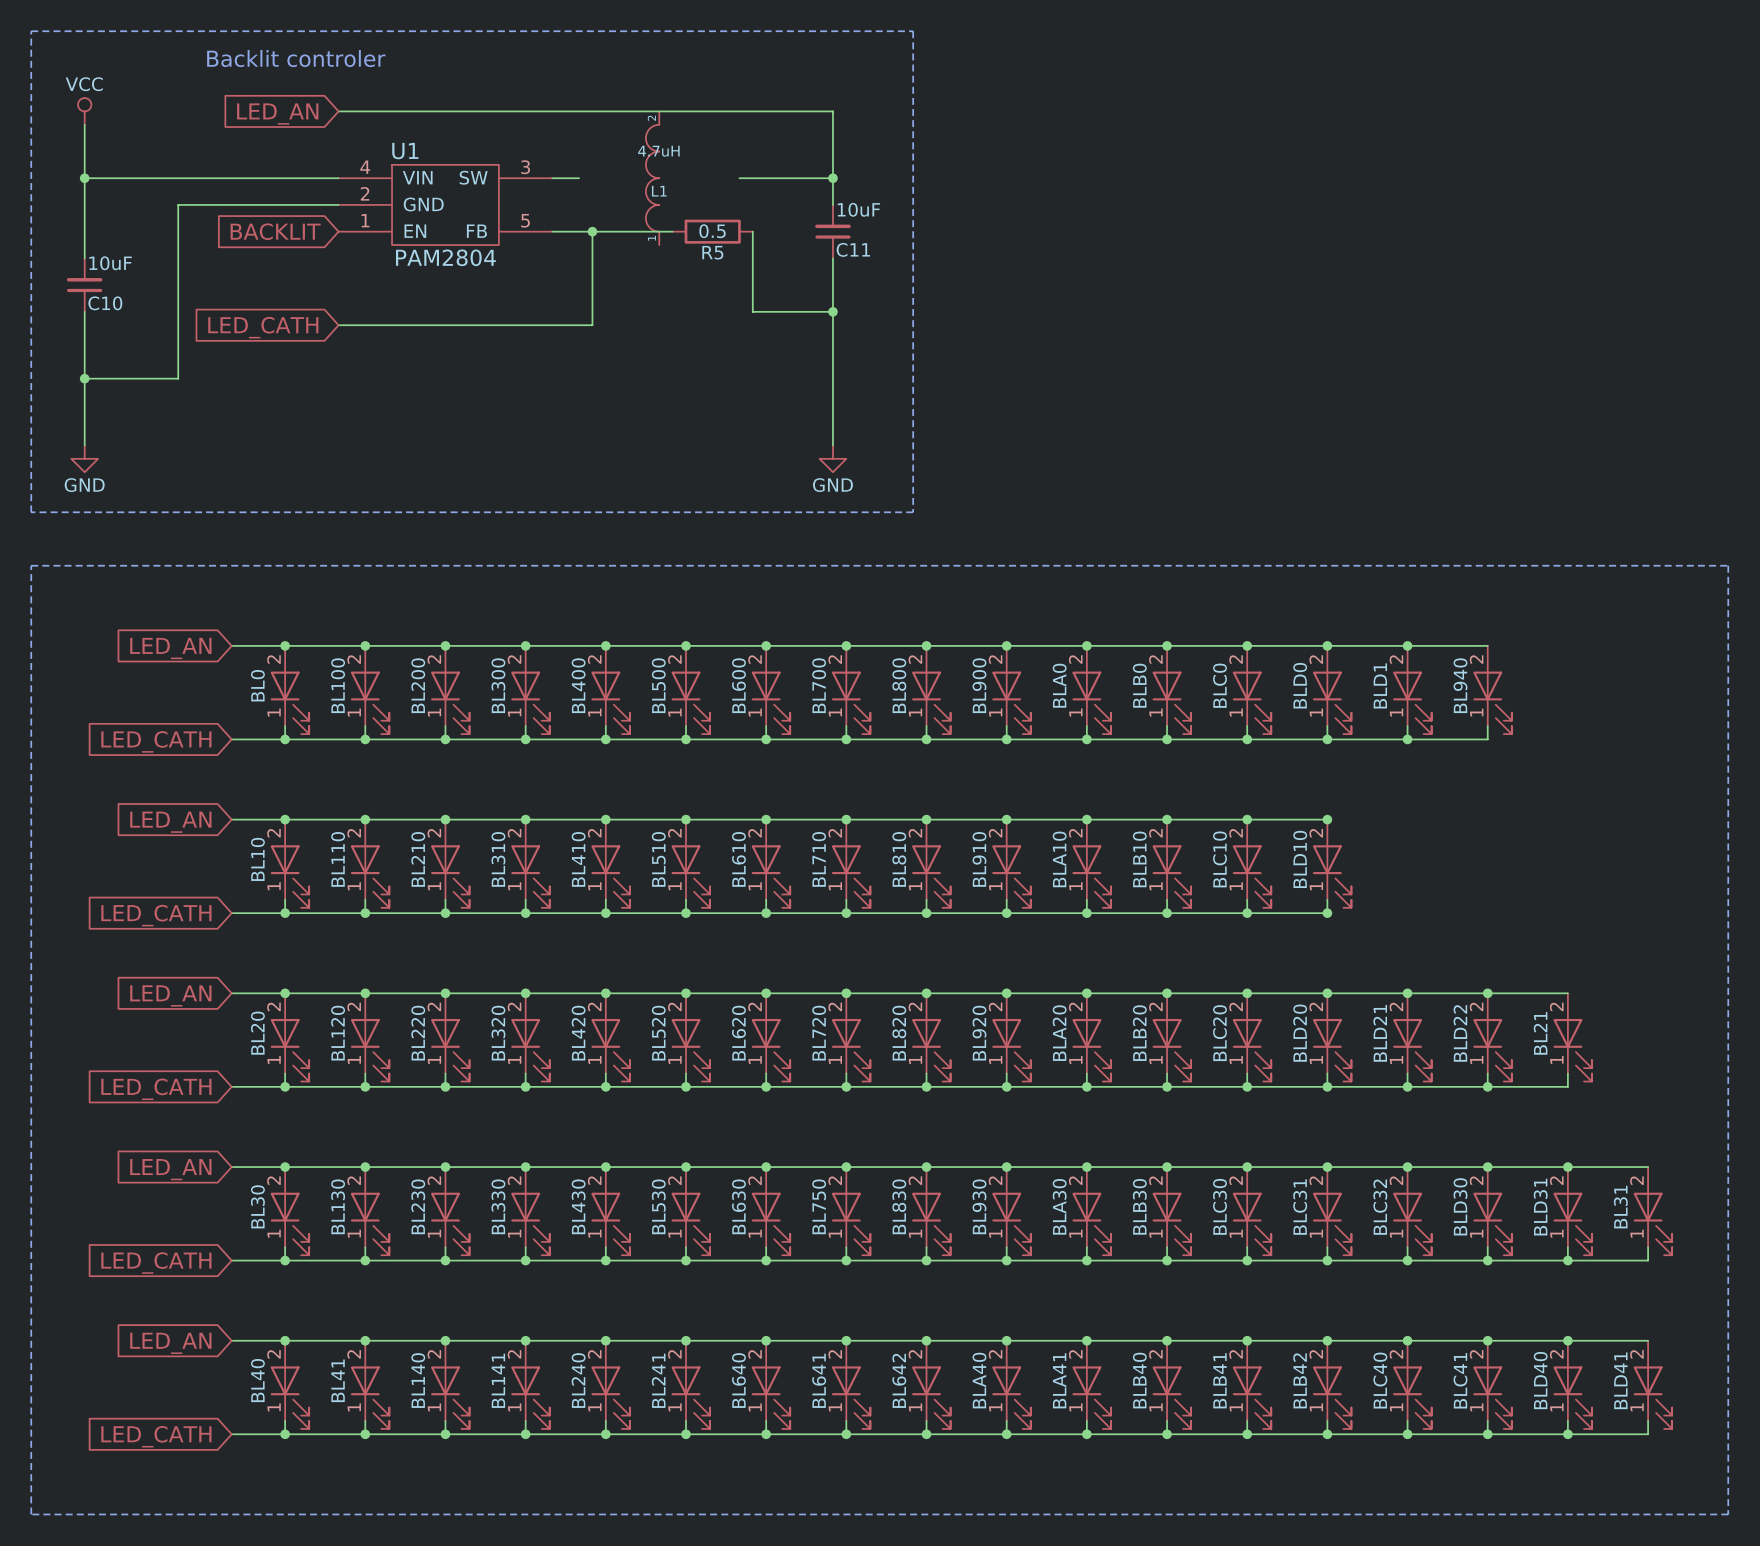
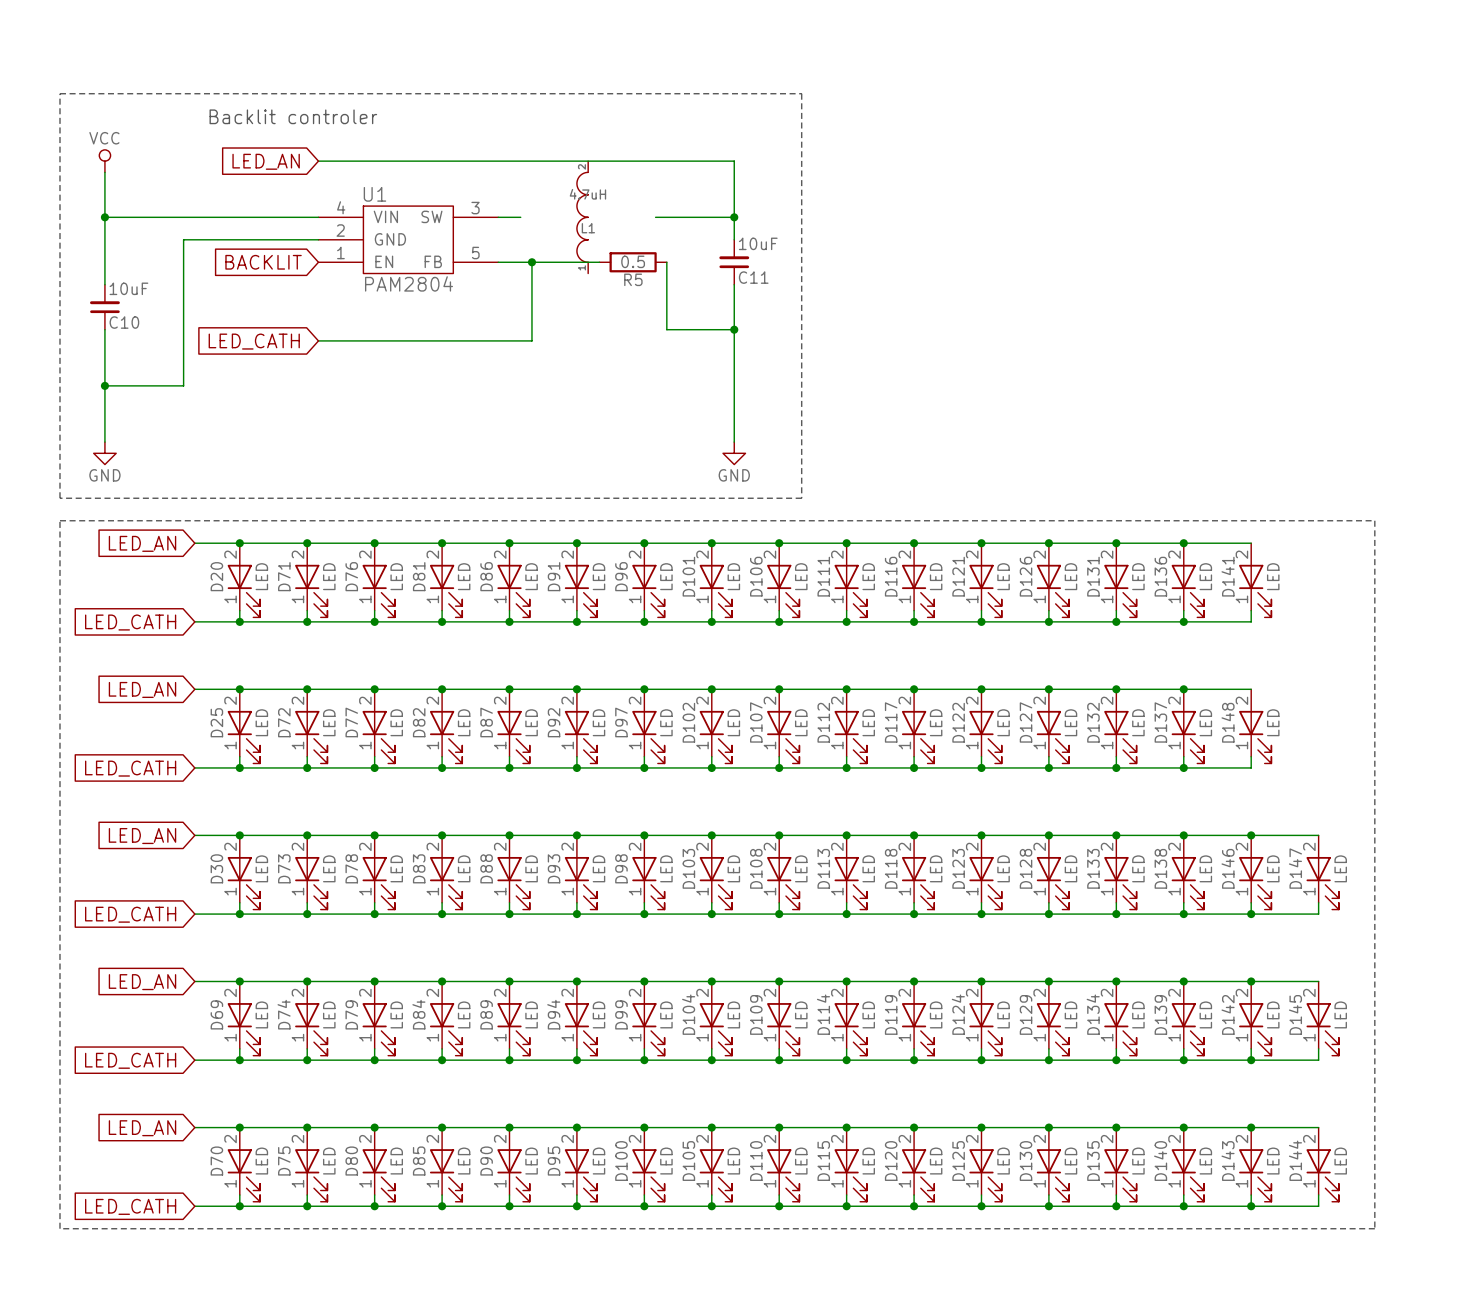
line: (31, 31) (31, 512) (913, 512) (913, 31) (31, 31) -> (59, 93) (59, 498) (801, 498) (801, 93) (59, 93)
text position: Backlit controler (296, 58) -> Backlit controler (293, 116)
power symbol position: VCC (84, 111) -> VCC (104, 161)
wire: (338, 111) (832, 111) (832, 204) -> (318, 161) (734, 161) (734, 239)
global label position: LED_AN (277, 114) -> LED_AN (266, 161)
wire: (84, 124) (84, 258) -> (104, 172) (104, 284)
wire: (84, 178) (338, 178) -> (104, 217) (318, 217)
junction: (84, 178) -> none
wire: (552, 178) (579, 178) -> (498, 217) (520, 217)
L1 position: (652, 178) -> (582, 217)
wire: (739, 178) (832, 178) -> (655, 217) (734, 217)
junction: (832, 178) -> none
wire: (338, 204) (178, 204) (178, 378) (84, 378) -> (318, 239) (183, 239) (183, 385) (104, 385)
U1 position: (445, 204) -> (408, 239)
global label position: BACKLIT (275, 231) -> BACKLIT (263, 262)
wire: (552, 231) (672, 231) -> (498, 262) (599, 262)
wire: (592, 231) (592, 325) (338, 325) -> (531, 262) (531, 340) (318, 340)
junction: (592, 231) -> none
R5 position: (712, 231) -> (633, 262)
wire: (752, 231) (752, 311) (832, 311) -> (666, 262) (666, 329) (734, 329)
C11 position: (832, 231) -> (734, 262)
junction: none -> (104, 217)
wire: (832, 258) (832, 445) -> (734, 284) (734, 442)
junction: none -> (734, 217)
C10 position: (84, 285) -> (104, 307)
wire: (84, 311) (84, 445) -> (104, 329) (104, 442)
junction: none -> (531, 262)
junction: (832, 311) -> none
global label position: LED_CATH (263, 327) -> LED_CATH (254, 341)
junction: (84, 378) -> none
junction: none -> (734, 329)
power symbol position: GND (84, 458) -> GND (104, 453)
junction: none -> (104, 385)
power symbol position: GND (832, 458) -> GND (734, 453)
line: (31, 565) (31, 1514) (1728, 1514) (1728, 565) (31, 565) -> (59, 520) (59, 1228) (1374, 1228) (1374, 520) (59, 520)
BL0 name: BL0 (257, 685) -> D20 (216, 576)
BL0 value: none -> LED (261, 576)
BL100 name: BL100 (338, 685) -> D71 (284, 576)
BL100 value: none -> LED (329, 576)
BL200 name: BL200 (418, 685) -> D76 (351, 576)
BL200 value: none -> LED (396, 576)
BL300 name: BL300 (498, 685) -> D81 (419, 576)
BL300 value: none -> LED (464, 576)
BL400 name: BL400 (578, 685) -> D86 (486, 576)
BL400 value: none -> LED (531, 576)
BL500 name: BL500 (658, 685) -> D91 (554, 576)
BL500 value: none -> LED (598, 576)
BL600 name: BL600 (738, 685) -> D96 (621, 576)
BL600 value: none -> LED (666, 576)
BL700 name: BL700 (819, 685) -> D101 (688, 576)
BL700 value: none -> LED (733, 576)
BL800 name: BL800 (899, 685) -> D106 (756, 576)
BL800 value: none -> LED (801, 576)
BL900 name: BL900 (979, 685) -> D111 (823, 576)
BL900 value: none -> LED (868, 576)
BLA0 name: BLA0 (1059, 685) -> D116 (891, 576)
BLA0 value: none -> LED (936, 576)
BLB0 name: BLB0 (1139, 685) -> D121 (958, 576)
BLB0 value: none -> LED (1003, 576)
BLC0 name: BLC0 (1220, 685) -> D126 (1026, 576)
BLC0 value: none -> LED (1070, 576)
BLD0 name: BLD0 (1300, 685) -> D131 (1093, 576)
BLD0 value: none -> LED (1138, 576)
BLD1 name: BLD1 (1380, 685) -> D136 (1160, 576)
BLD1 value: none -> LED (1205, 576)
BL940 name: BL940 (1460, 685) -> D141 (1228, 576)
BL940 value: none -> LED (1273, 576)
wire: none -> (1116, 689) (1251, 689)
junction: none -> (1183, 689)
BL10 name: BL10 (257, 859) -> D25 (216, 722)
BL10 value: none -> LED (261, 722)
BL110 name: BL110 (338, 859) -> D72 (284, 722)
BL110 value: none -> LED (329, 722)
BL210 name: BL210 (418, 859) -> D77 (351, 722)
BL210 value: none -> LED (396, 722)
BL310 name: BL310 (498, 859) -> D82 (419, 722)
BL310 value: none -> LED (464, 722)
BL410 name: BL410 (578, 859) -> D87 (486, 722)
BL410 value: none -> LED (531, 722)
BL510 name: BL510 (658, 859) -> D92 (554, 722)
BL510 value: none -> LED (598, 722)
BL610 name: BL610 (738, 859) -> D97 (621, 722)
BL610 value: none -> LED (666, 722)
BL710 name: BL710 (819, 859) -> D102 (688, 722)
BL710 value: none -> LED (733, 722)
BL810 name: BL810 (899, 859) -> D107 (756, 722)
BL810 value: none -> LED (801, 722)
BL910 name: BL910 (979, 859) -> D112 (823, 722)
BL910 value: none -> LED (868, 722)
BLA10 name: BLA10 (1059, 859) -> D117 (891, 722)
BLA10 value: none -> LED (936, 722)
BLB10 name: BLB10 (1139, 859) -> D122 (958, 722)
BLB10 value: none -> LED (1003, 722)
BLC10 name: BLC10 (1220, 859) -> D127 (1026, 722)
BLC10 value: none -> LED (1070, 722)
BLD10 name: BLD10 (1300, 859) -> D132 (1093, 722)
BLD10 value: none -> LED (1138, 722)
D137: none -> LED (1187, 726)
D148: none -> LED (1255, 726)
wire: none -> (1183, 756) (1183, 767)
wire: none -> (1251, 756) (1251, 767) (1116, 767)
junction: none -> (1183, 767)
BL20 name: BL20 (257, 1033) -> D30 (216, 868)
BL20 value: none -> LED (261, 868)
BL120 name: BL120 (338, 1033) -> D73 (284, 868)
BL120 value: none -> LED (329, 868)
BL220 name: BL220 (418, 1033) -> D78 (351, 868)
BL220 value: none -> LED (396, 868)
BL320 name: BL320 (498, 1033) -> D83 (419, 868)
BL320 value: none -> LED (464, 868)
BL420 name: BL420 (578, 1033) -> D88 (486, 868)
BL420 value: none -> LED (531, 868)
BL520 name: BL520 (658, 1033) -> D93 (554, 868)
BL520 value: none -> LED (598, 868)
BL620 name: BL620 (738, 1033) -> D98 (621, 868)
BL620 value: none -> LED (666, 868)
BL720 name: BL720 (819, 1033) -> D103 (688, 868)
BL720 value: none -> LED (733, 868)
BL820 name: BL820 (899, 1033) -> D108 (756, 868)
BL820 value: none -> LED (801, 868)
BL920 name: BL920 (979, 1033) -> D113 (823, 868)
BL920 value: none -> LED (868, 868)
BLA20 name: BLA20 (1059, 1033) -> D118 (891, 868)
BLA20 value: none -> LED (936, 868)
BLB20 name: BLB20 (1139, 1033) -> D123 (958, 868)
BLB20 value: none -> LED (1003, 868)
BLC20 name: BLC20 (1220, 1033) -> D128 (1026, 868)
BLC20 value: none -> LED (1070, 868)
BLD20 name: BLD20 (1300, 1033) -> D133 (1093, 868)
BLD20 value: none -> LED (1138, 868)
BLD21 name: BLD21 (1380, 1033) -> D138 (1160, 868)
BLD21 value: none -> LED (1205, 868)
BLD22 name: BLD22 (1460, 1033) -> D146 (1228, 868)
BLD22 value: none -> LED (1273, 868)
BL21 name: BL21 (1540, 1033) -> D147 (1295, 868)
BL21 value: none -> LED (1340, 868)
wire: (1567, 1167) (1648, 1167) -> none
junction: (1567, 1167) -> none
BL30 name: BL30 (257, 1206) -> D69 (216, 1014)
BL30 value: none -> LED (261, 1014)
BL130 name: BL130 (338, 1206) -> D74 (284, 1014)
BL130 value: none -> LED (329, 1014)
BL230 name: BL230 (418, 1206) -> D79 (351, 1014)
BL230 value: none -> LED (396, 1014)
BL330 name: BL330 (498, 1206) -> D84 (418, 1014)
BL330 value: none -> LED (464, 1014)
BL430 name: BL430 (578, 1206) -> D89 (486, 1014)
BL430 value: none -> LED (531, 1014)
BL530 name: BL530 (658, 1206) -> D94 (553, 1014)
BL530 value: none -> LED (598, 1014)
BL630 name: BL630 (738, 1206) -> D99 (621, 1014)
BL630 value: none -> LED (666, 1014)
BL750 name: BL750 (819, 1206) -> D104 (688, 1014)
BL750 value: none -> LED (733, 1014)
BL830 name: BL830 (899, 1206) -> D109 (756, 1014)
BL830 value: none -> LED (801, 1014)
BL930 name: BL930 (979, 1206) -> D114 (823, 1014)
BL930 value: none -> LED (868, 1014)
BLA30 name: BLA30 (1059, 1206) -> D119 (891, 1014)
BLA30 value: none -> LED (936, 1014)
BLB30 name: BLB30 (1139, 1206) -> D124 (958, 1014)
BLB30 value: none -> LED (1003, 1014)
BLC30 name: BLC30 (1220, 1206) -> D129 (1026, 1014)
BLC30 value: none -> LED (1070, 1014)
BLC31 value: none -> LED (1138, 1014)
BLC32 value: none -> LED (1205, 1014)
BLD30 name: BLD30 (1460, 1206) -> D142 (1228, 1014)
BLD30 value: none -> LED (1273, 1014)
BLD31 value: none -> LED (1340, 1014)
BLC31 name: BLC31 (1300, 1207) -> D134 (1093, 1014)
BLC32 name: BLC32 (1380, 1207) -> D139 (1160, 1014)
BLD31 name: BLD31 (1540, 1207) -> D145 (1295, 1014)
BL31: (1652, 1211) -> none
wire: (1648, 1247) (1648, 1260) (1567, 1260) -> none
junction: (1567, 1260) -> none
wire: (1567, 1340) (1648, 1340) -> none
junction: (1567, 1340) -> none
BL40 name: BL40 (257, 1380) -> D70 (216, 1161)
BL40 value: none -> LED (261, 1161)
BL41 name: BL41 (338, 1380) -> D75 (284, 1161)
BL41 value: none -> LED (329, 1161)
BL140 name: BL140 (418, 1380) -> D80 (351, 1161)
BL140 value: none -> LED (396, 1161)
BL141 name: BL141 (498, 1380) -> D85 (419, 1161)
BL141 value: none -> LED (464, 1161)
BL240 name: BL240 (578, 1380) -> D90 (486, 1161)
BL240 value: none -> LED (531, 1161)
BL241 name: BL241 (658, 1380) -> D95 (554, 1161)
BL241 value: none -> LED (598, 1161)
BL640 name: BL640 (738, 1380) -> D100 (621, 1161)
BL640 value: none -> LED (666, 1161)
BL641 name: BL641 (819, 1380) -> D105 (688, 1161)
BL641 value: none -> LED (733, 1161)
BL642 name: BL642 (899, 1380) -> D110 (756, 1161)
BL642 value: none -> LED (801, 1161)
BLA40 name: BLA40 (979, 1380) -> D115 (823, 1161)
BLA40 value: none -> LED (868, 1161)
BLA41 name: BLA41 (1059, 1380) -> D120 (891, 1161)
BLA41 value: none -> LED (936, 1161)
BLB40 name: BLB40 (1139, 1380) -> D125 (958, 1161)
BLB40 value: none -> LED (1003, 1161)
BLB41 name: BLB41 (1219, 1380) -> D130 (1026, 1161)
BLB41 value: none -> LED (1070, 1161)
BLB42 name: BLB42 (1300, 1380) -> D135 (1093, 1161)
BLB42 value: none -> LED (1138, 1161)
BLC40 name: BLC40 (1380, 1380) -> D140 (1160, 1161)
BLC40 value: none -> LED (1205, 1161)
BLC41 name: BLC41 (1460, 1380) -> D143 (1228, 1161)
BLC41 value: none -> LED (1273, 1161)
BLD40 name: BLD40 (1540, 1380) -> D144 (1295, 1160)
BLD40 value: none -> LED (1340, 1161)
BLD41: (1652, 1384) -> none
wire: (1648, 1420) (1648, 1434) (1567, 1434) -> none
junction: (1567, 1434) -> none

